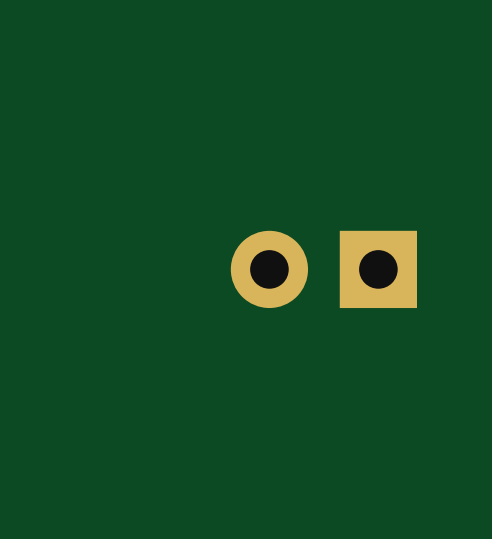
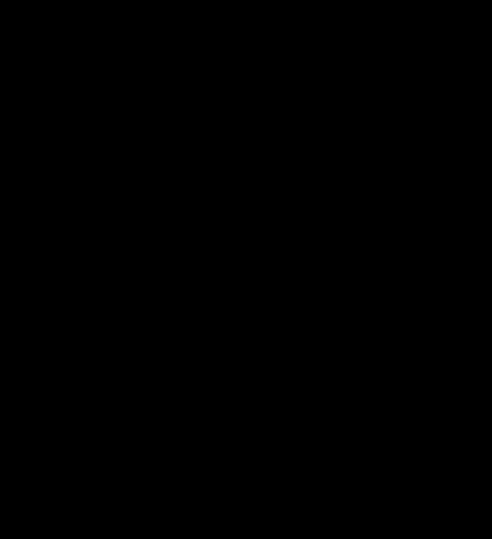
part: (323, 269) -> none

